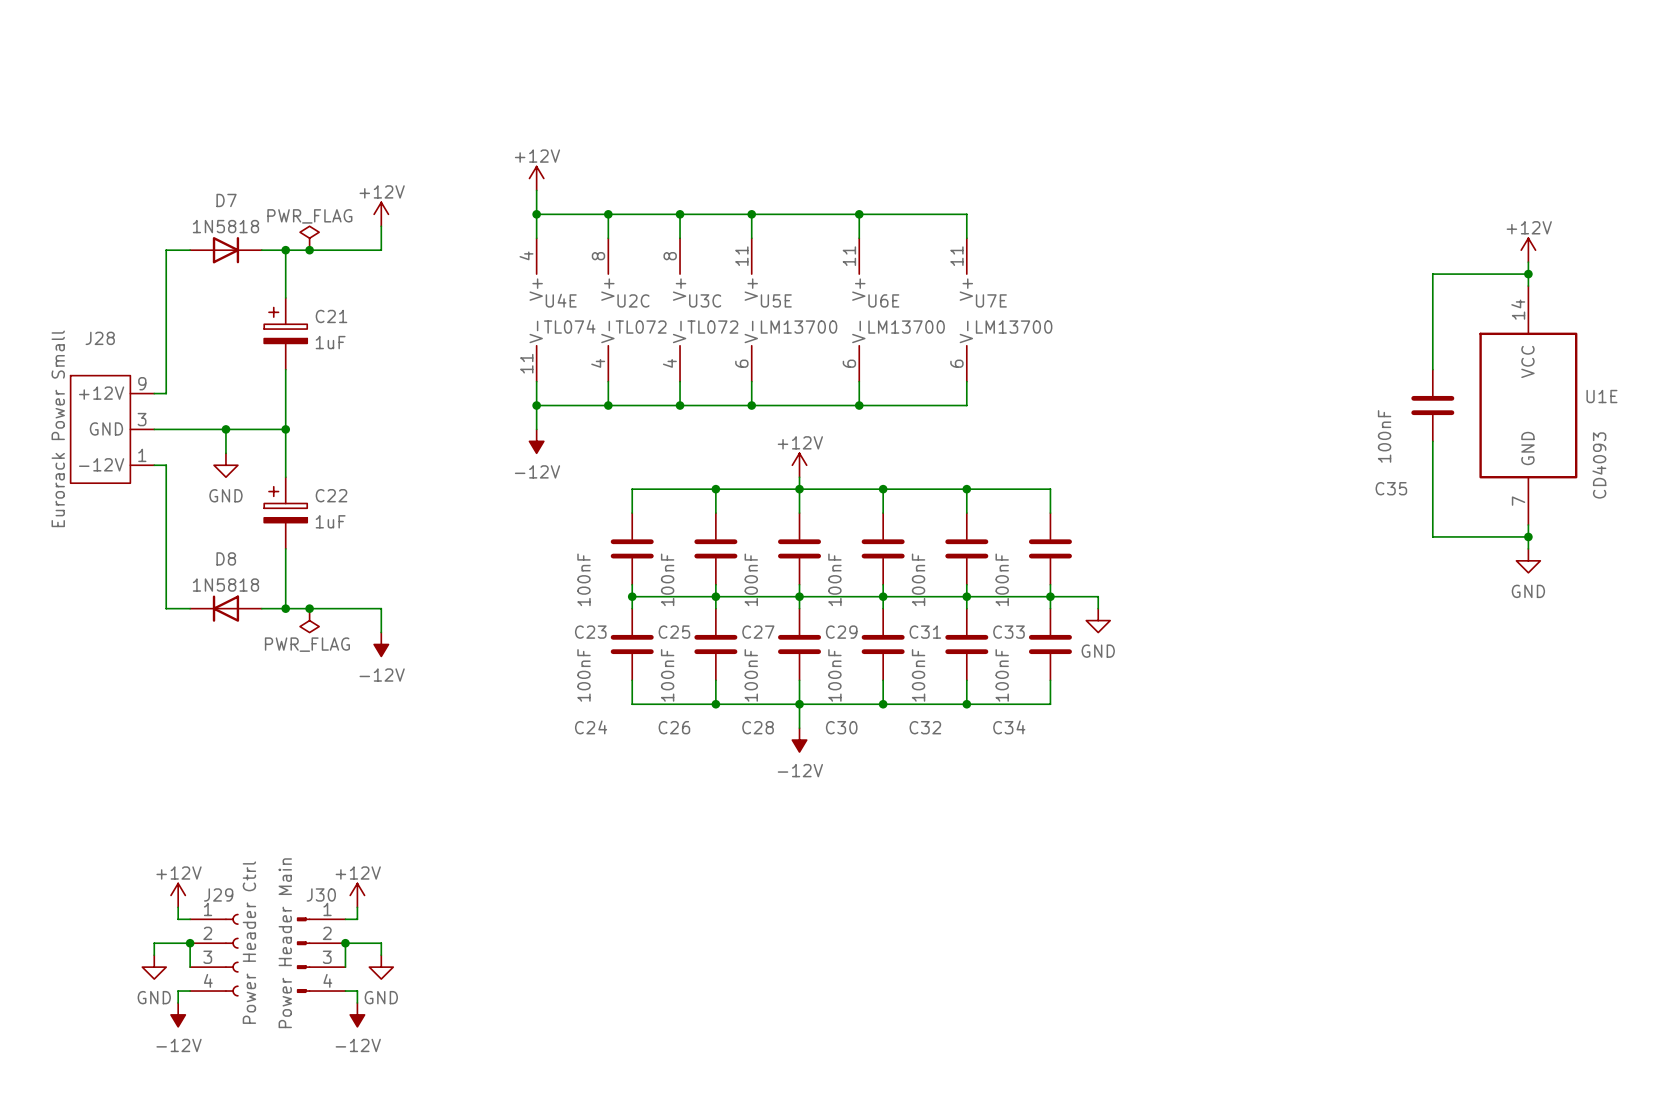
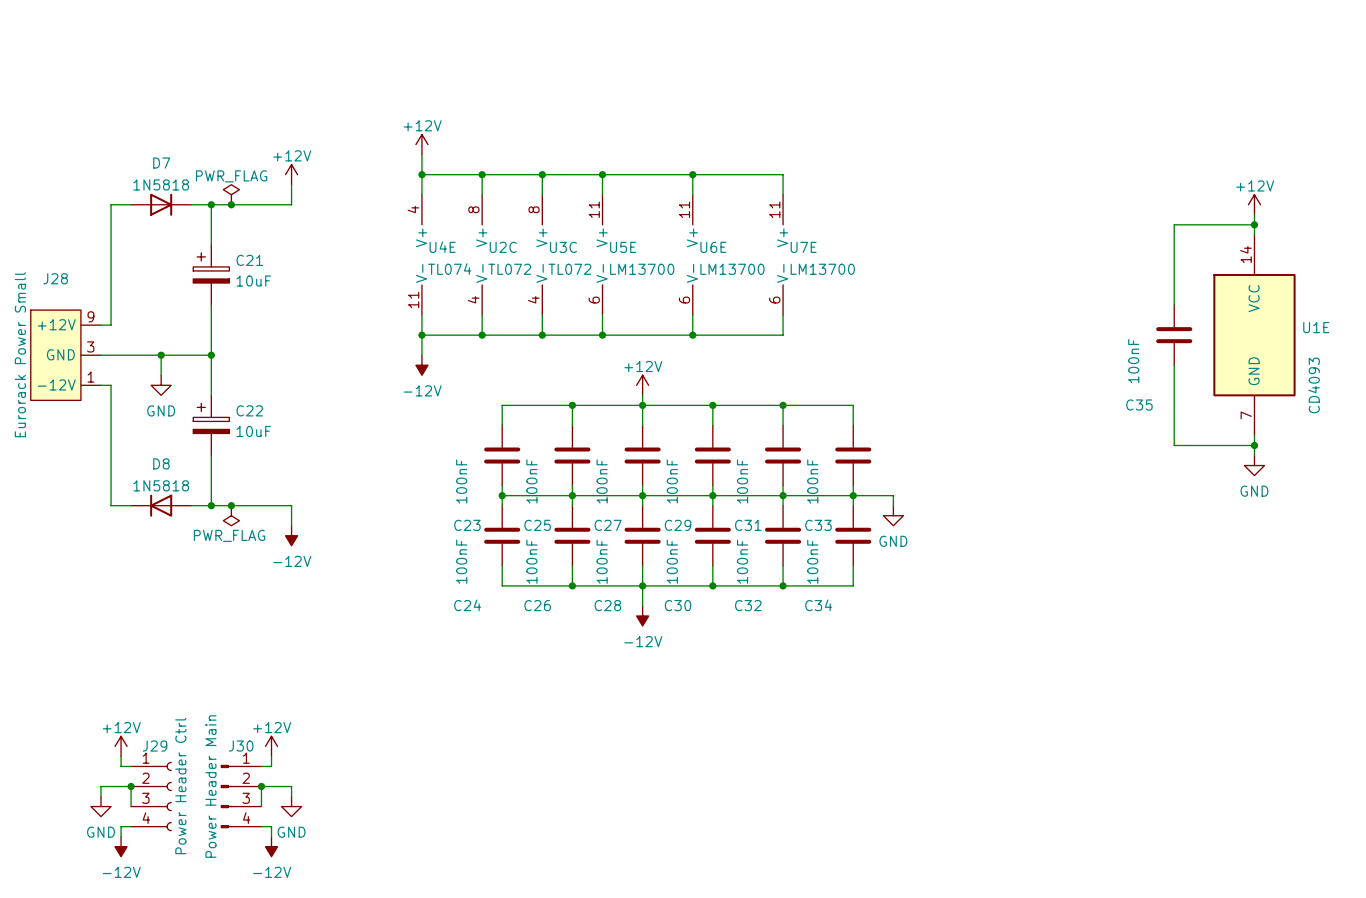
C21 value: 1uF (330, 342) -> 10uF (253, 281)
C22 value: 1uF (330, 521) -> 10uF (253, 431)

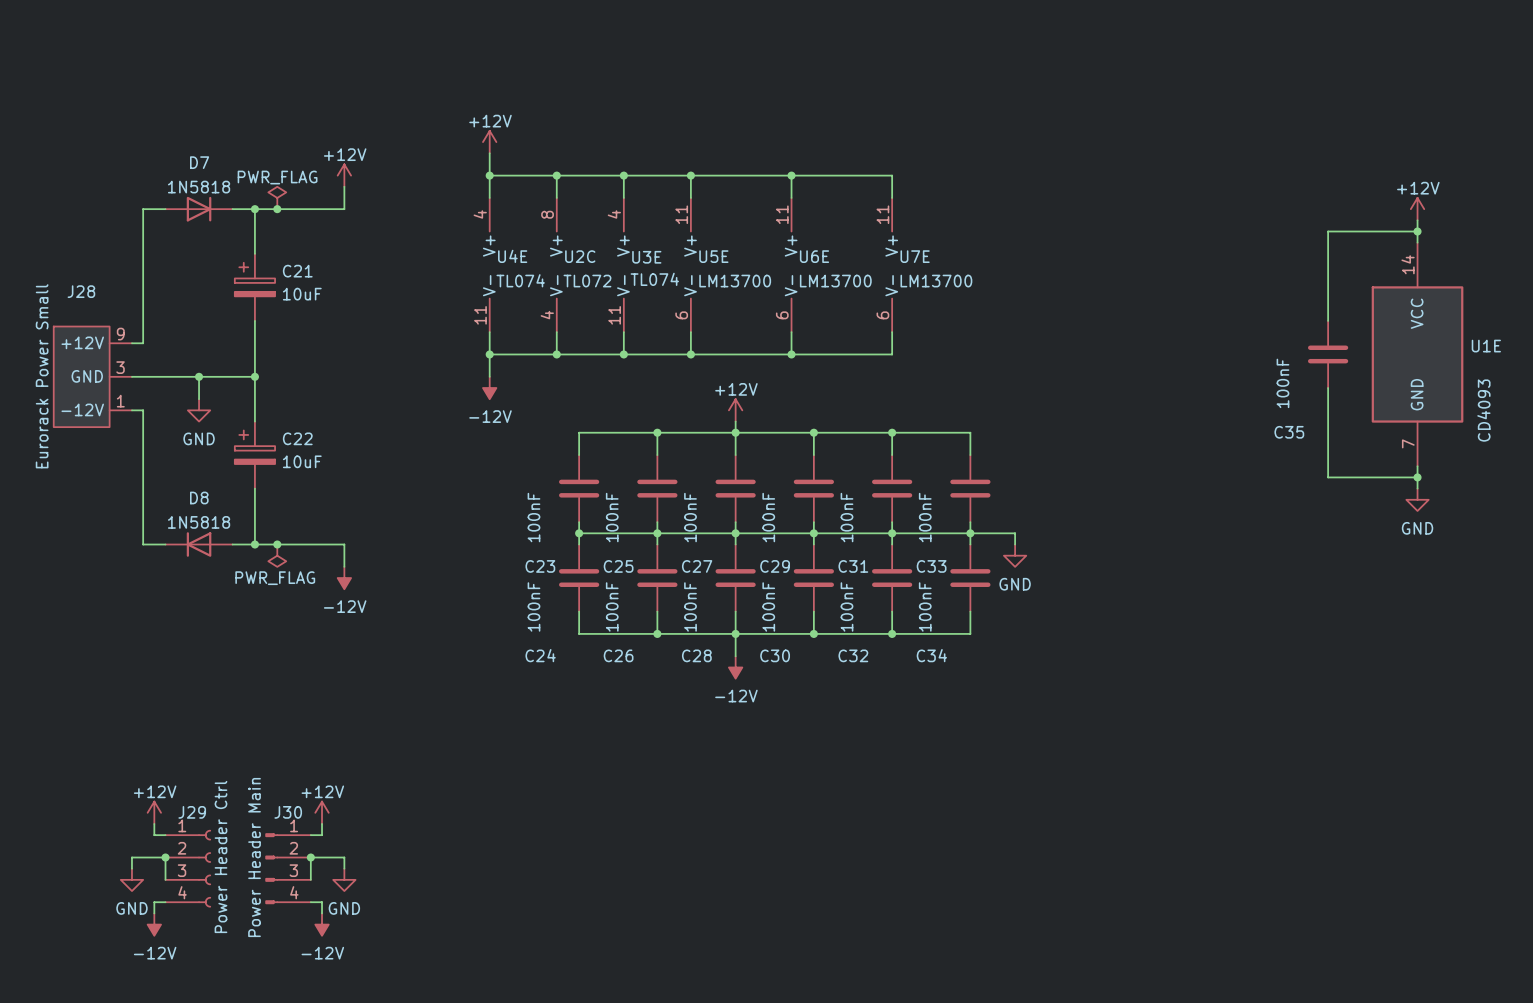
U3C pin number: 8 (534, 209) -> 4 (614, 214)
U3C name: U3C (563, 247) -> U3E (646, 257)
U3C value: TL072 (569, 269) -> TL074 (654, 279)
U3C pin number: 4 (533, 299) -> 11 (614, 315)

